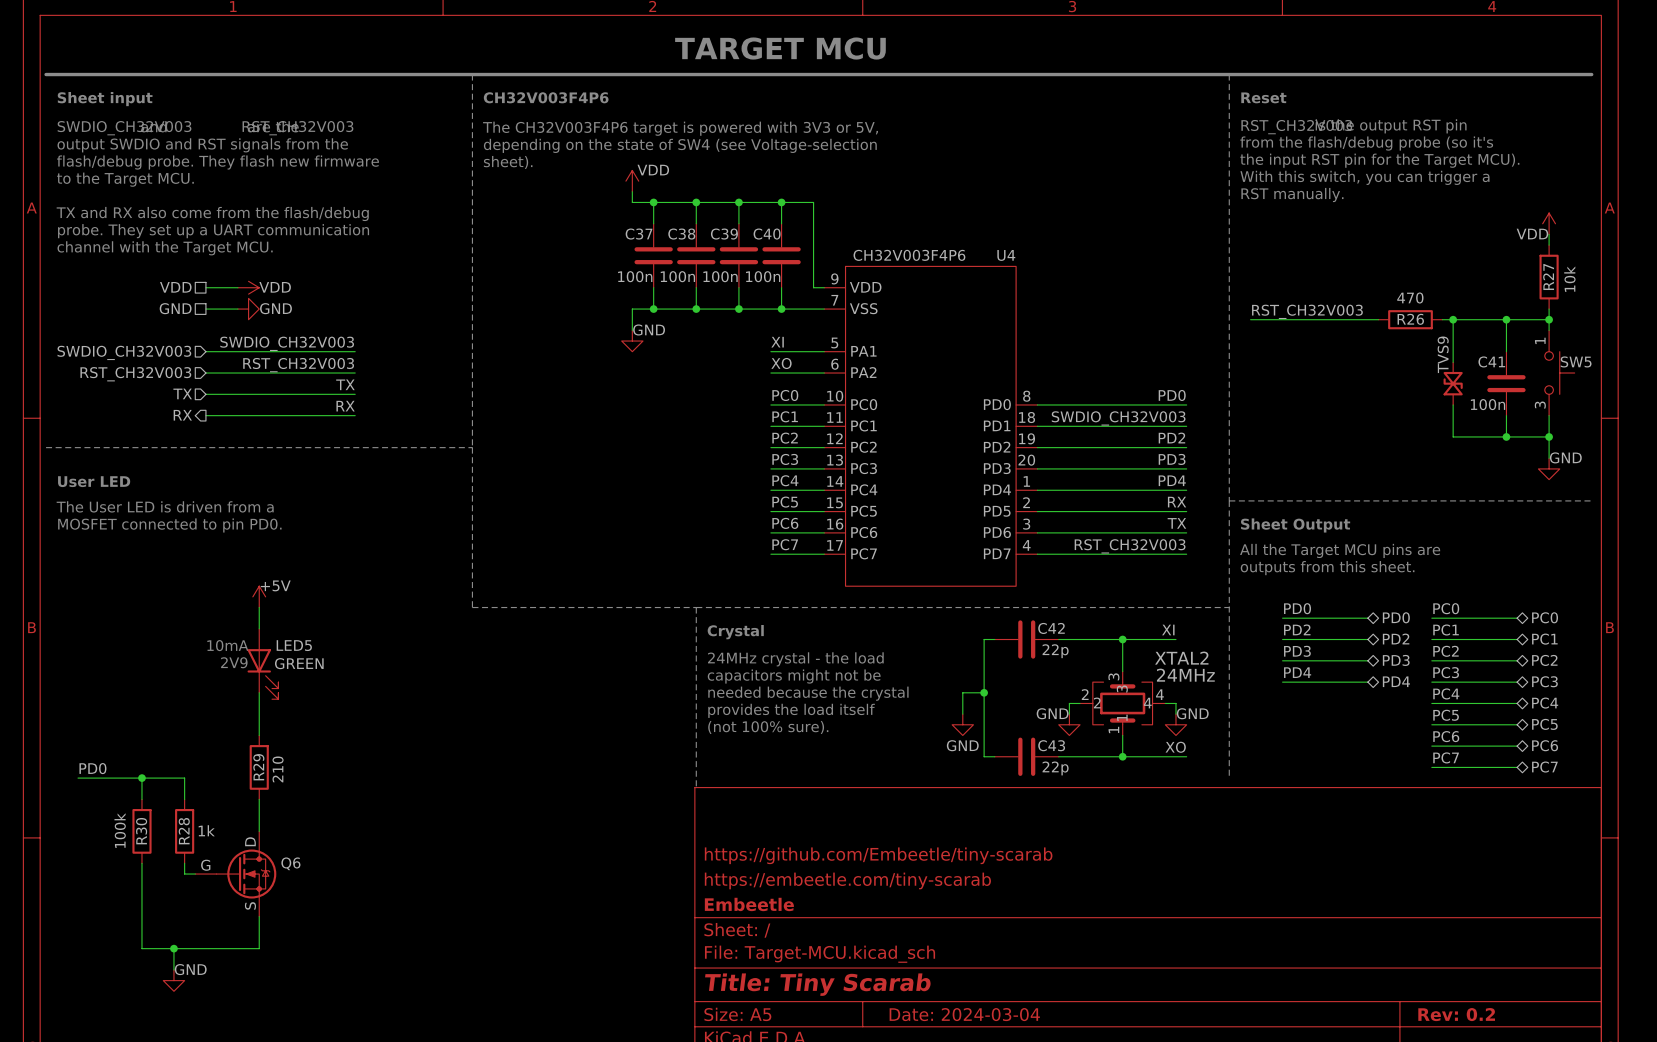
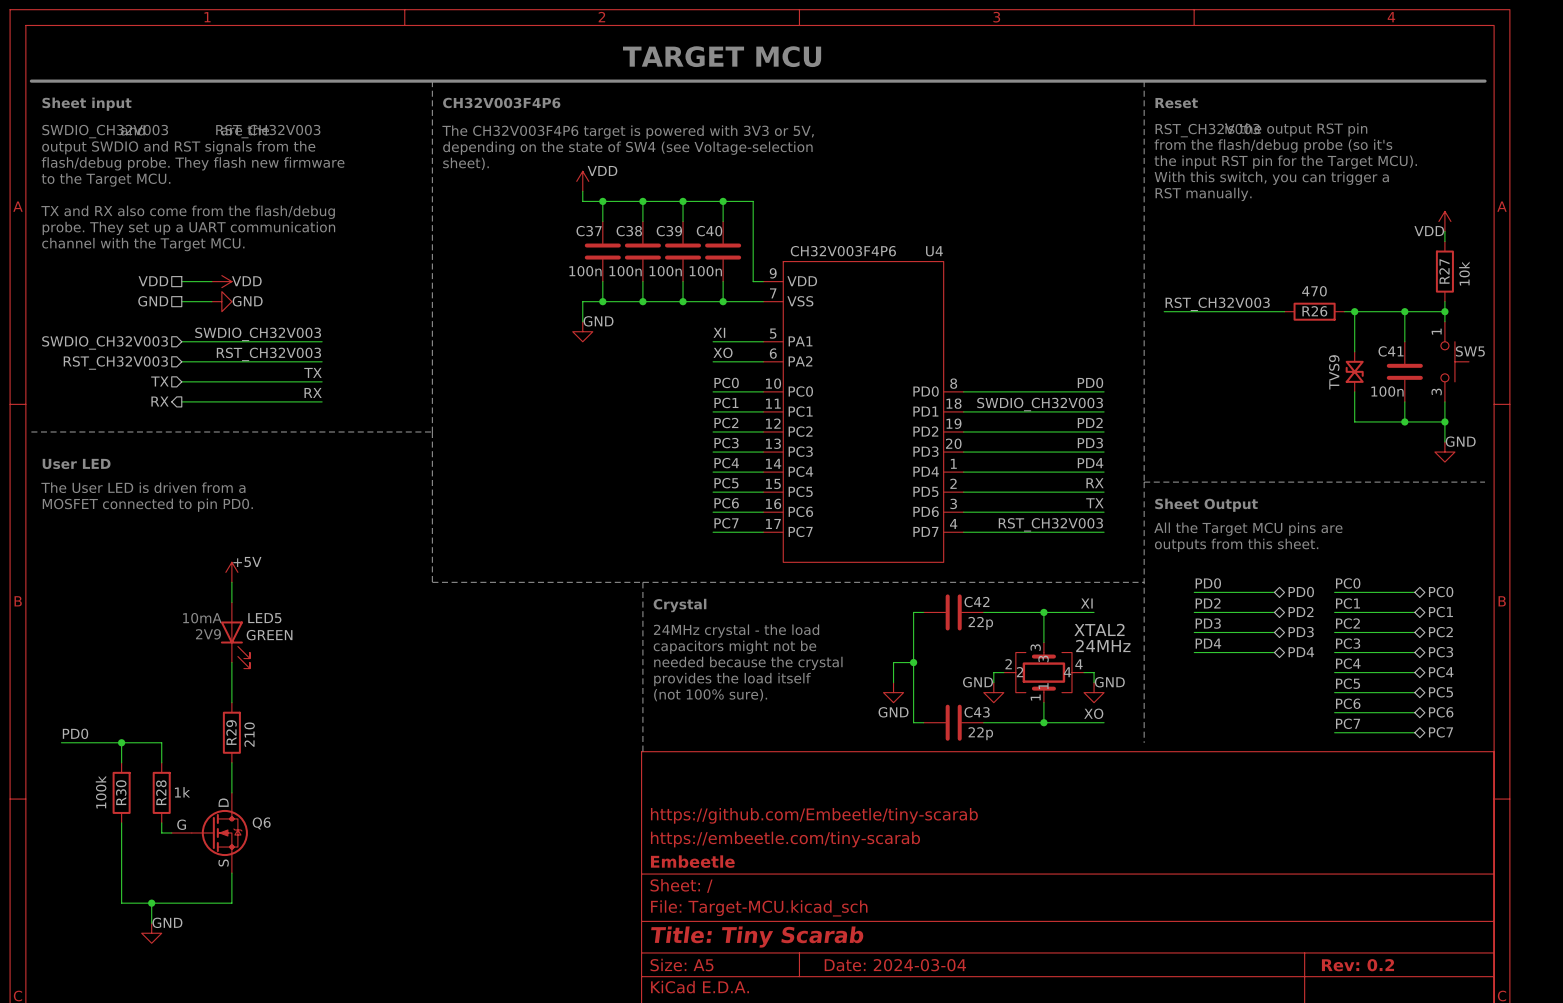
TVS9 name position: TVS9 (1443, 354) -> TVS9 (1334, 372)

